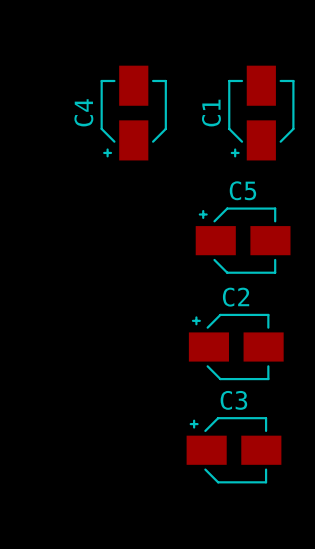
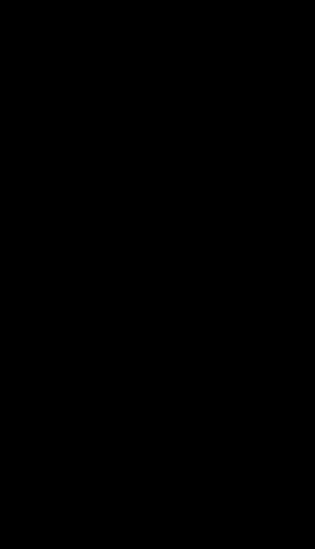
C4: (133, 113) -> none
C1: (261, 113) -> none
C5: (243, 240) -> none
C2: (236, 346) -> none
C3: (233, 450) -> none

